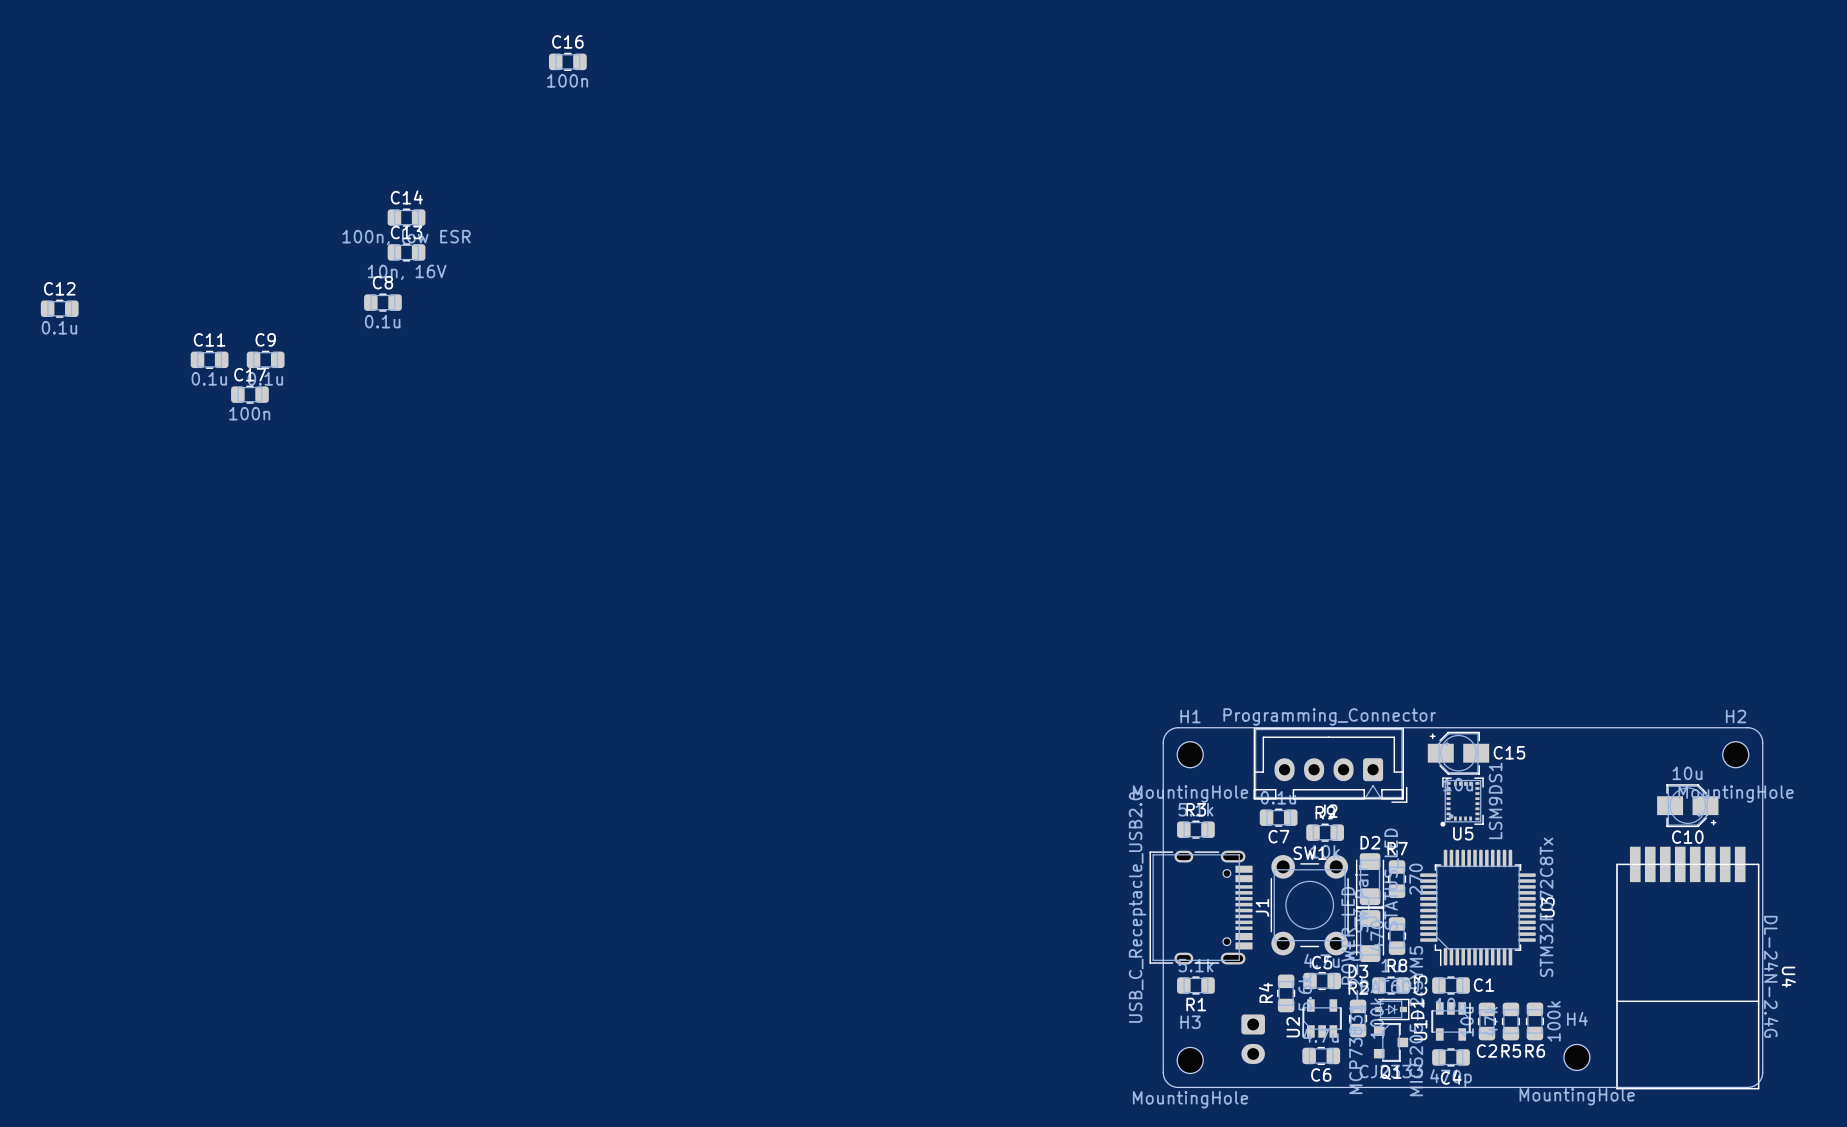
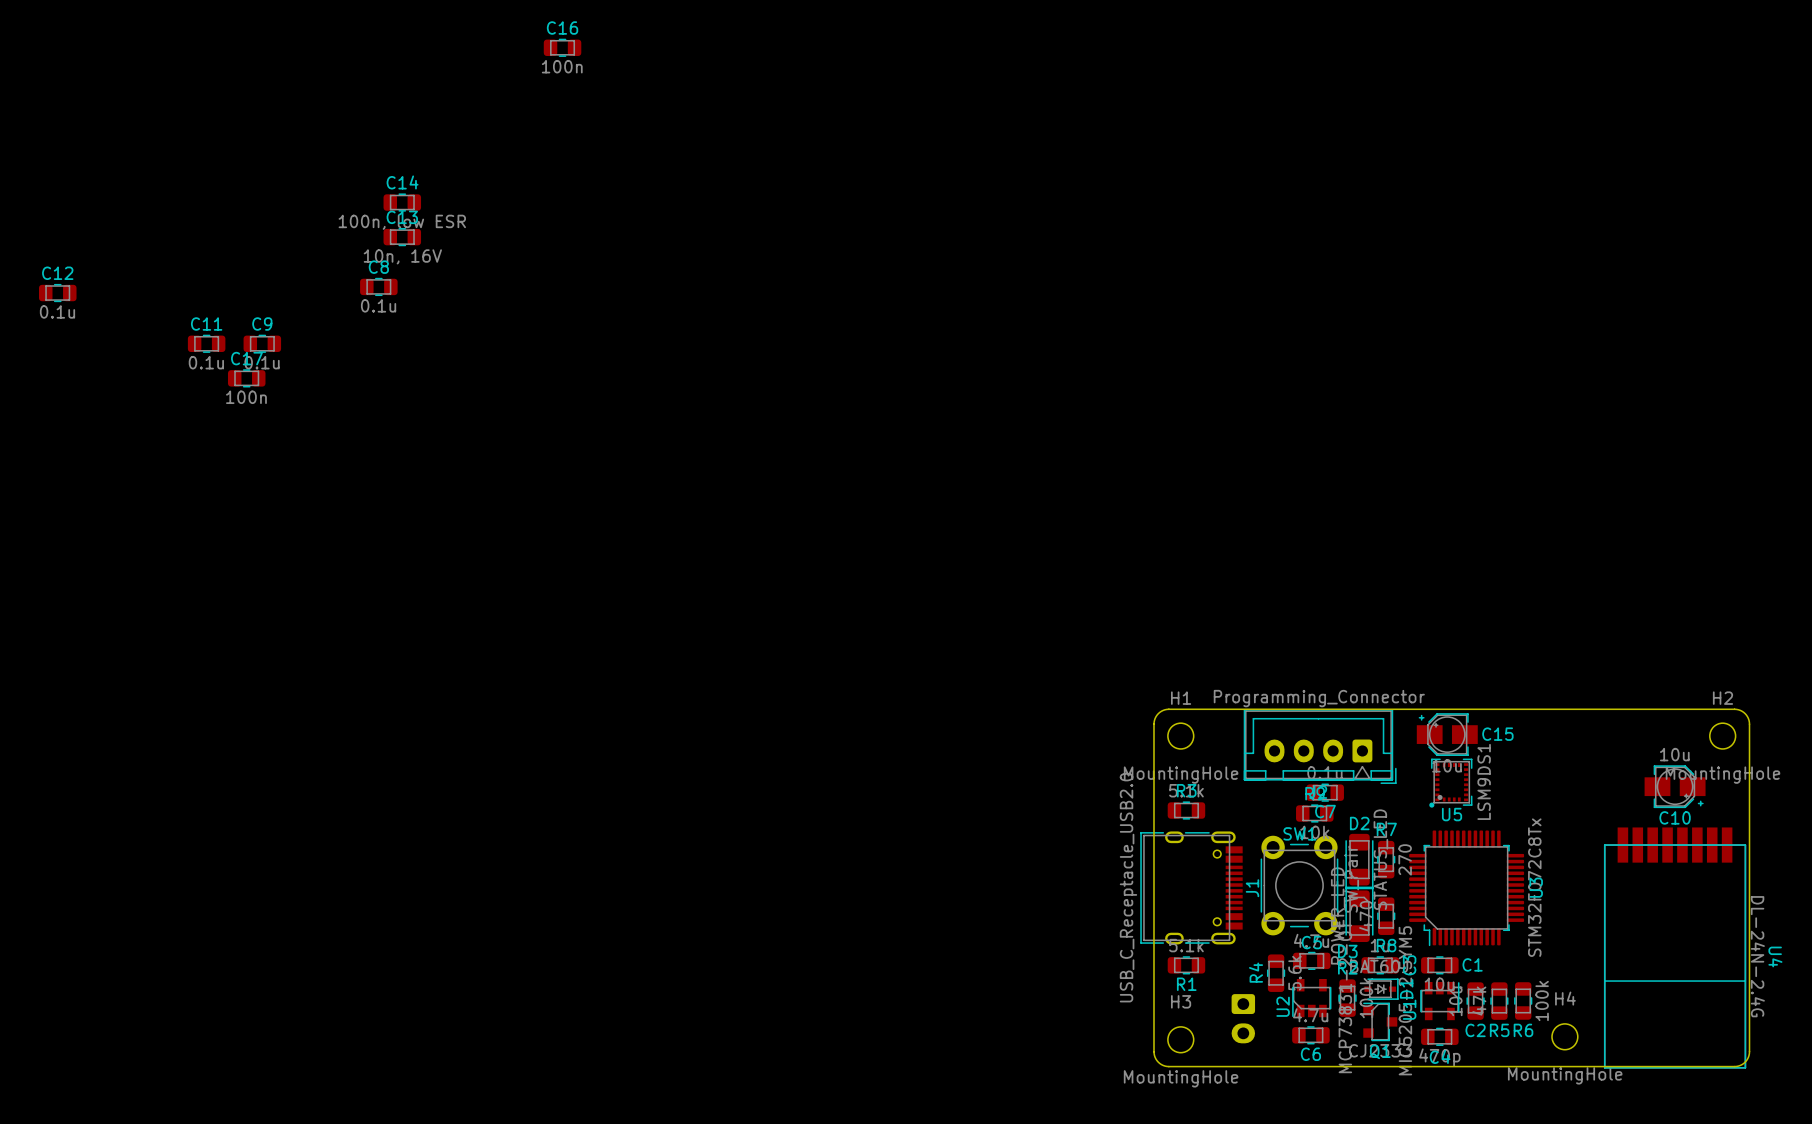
C7 position: (1278, 817) -> (1325, 792)

